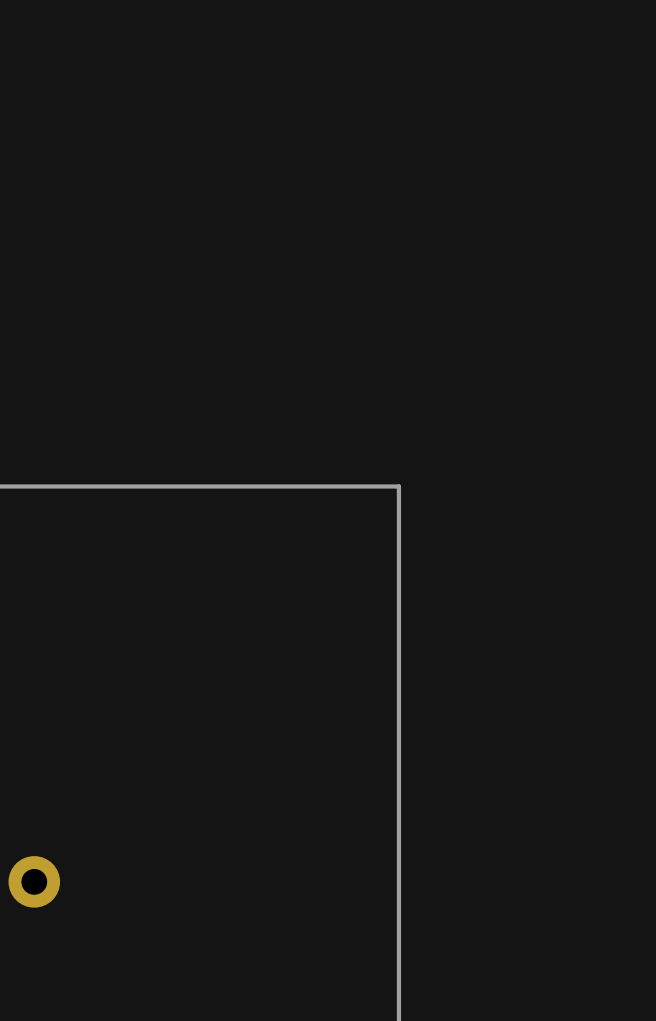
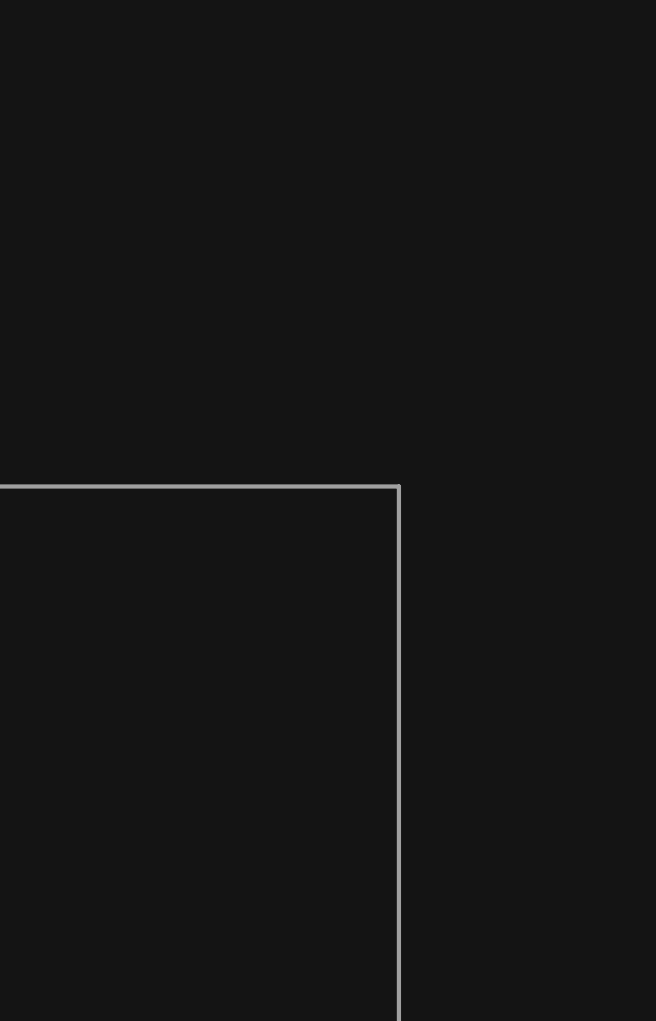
via: (34, 881) -> none

